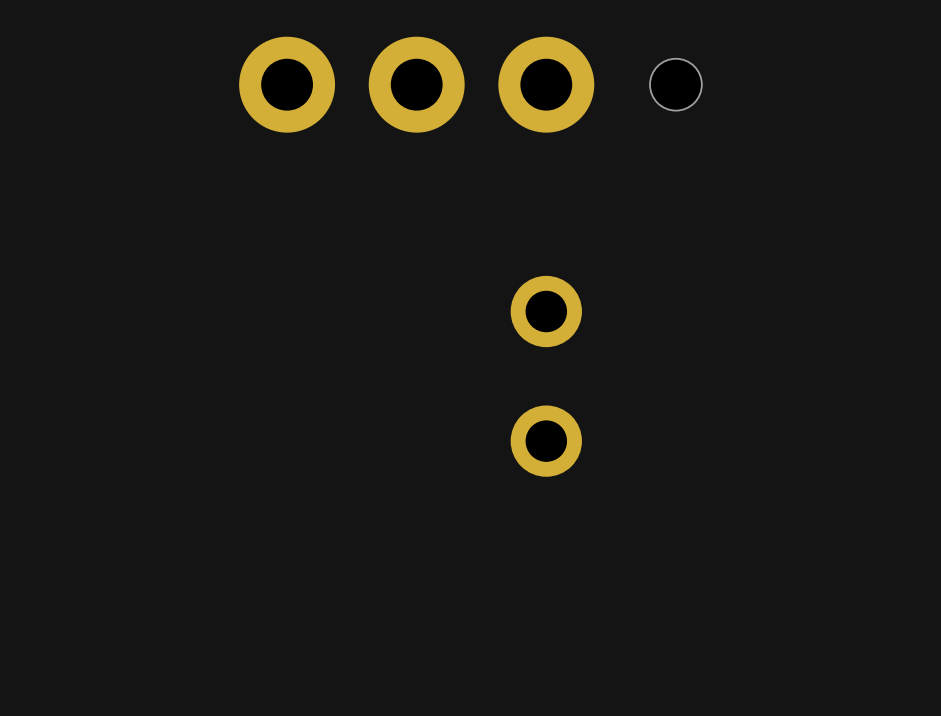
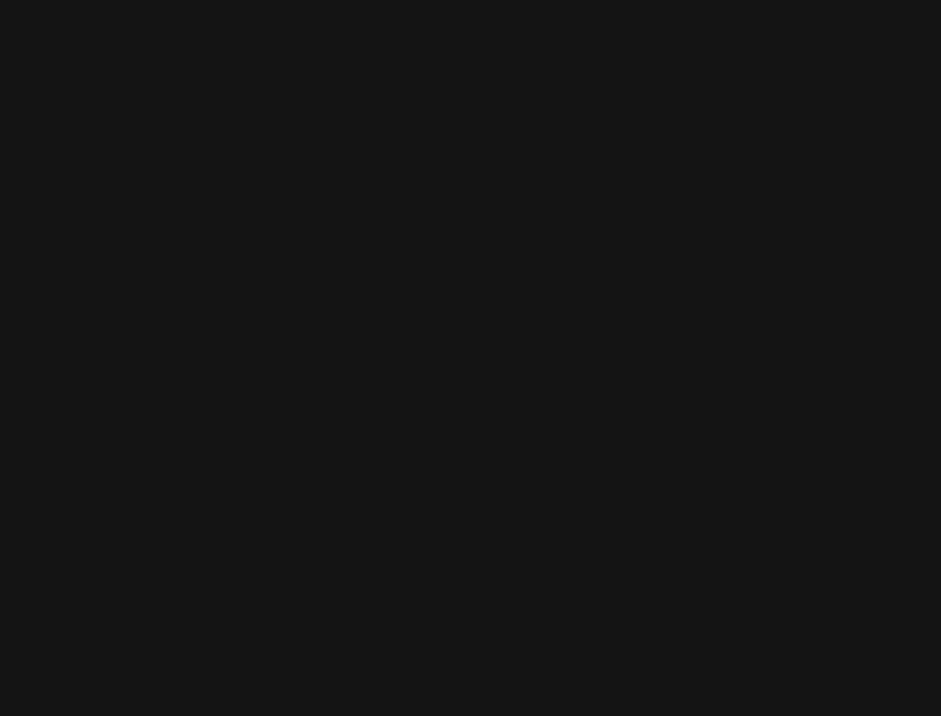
part: (470, 84) -> none
part: (546, 376) -> none

